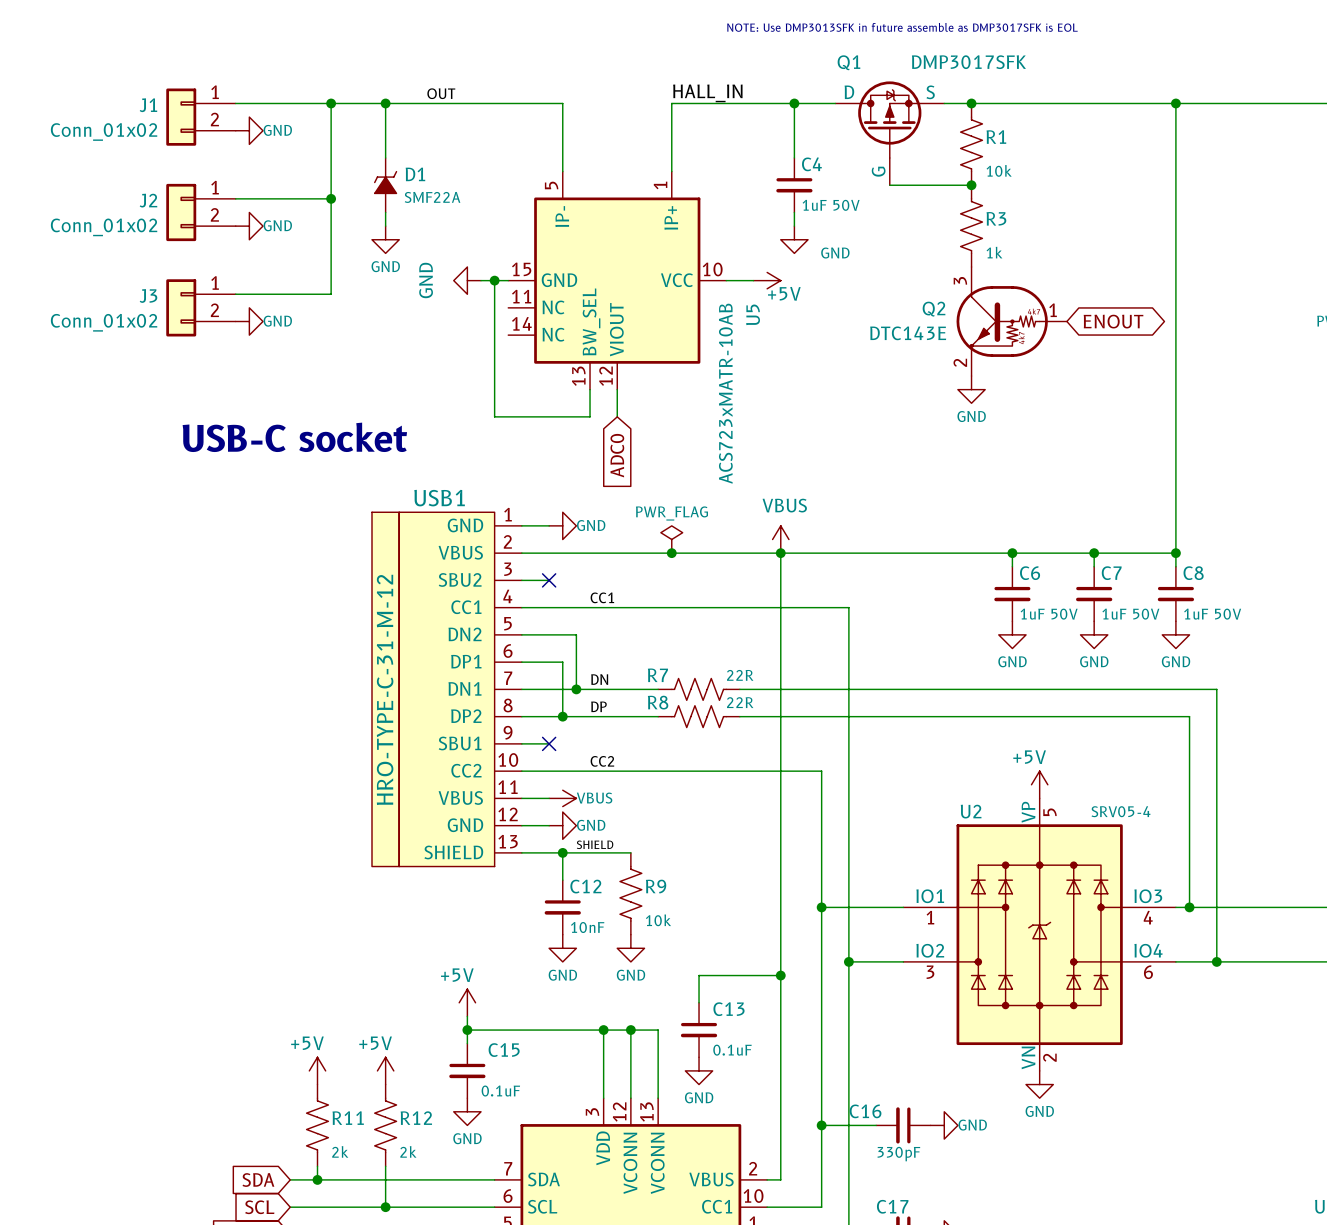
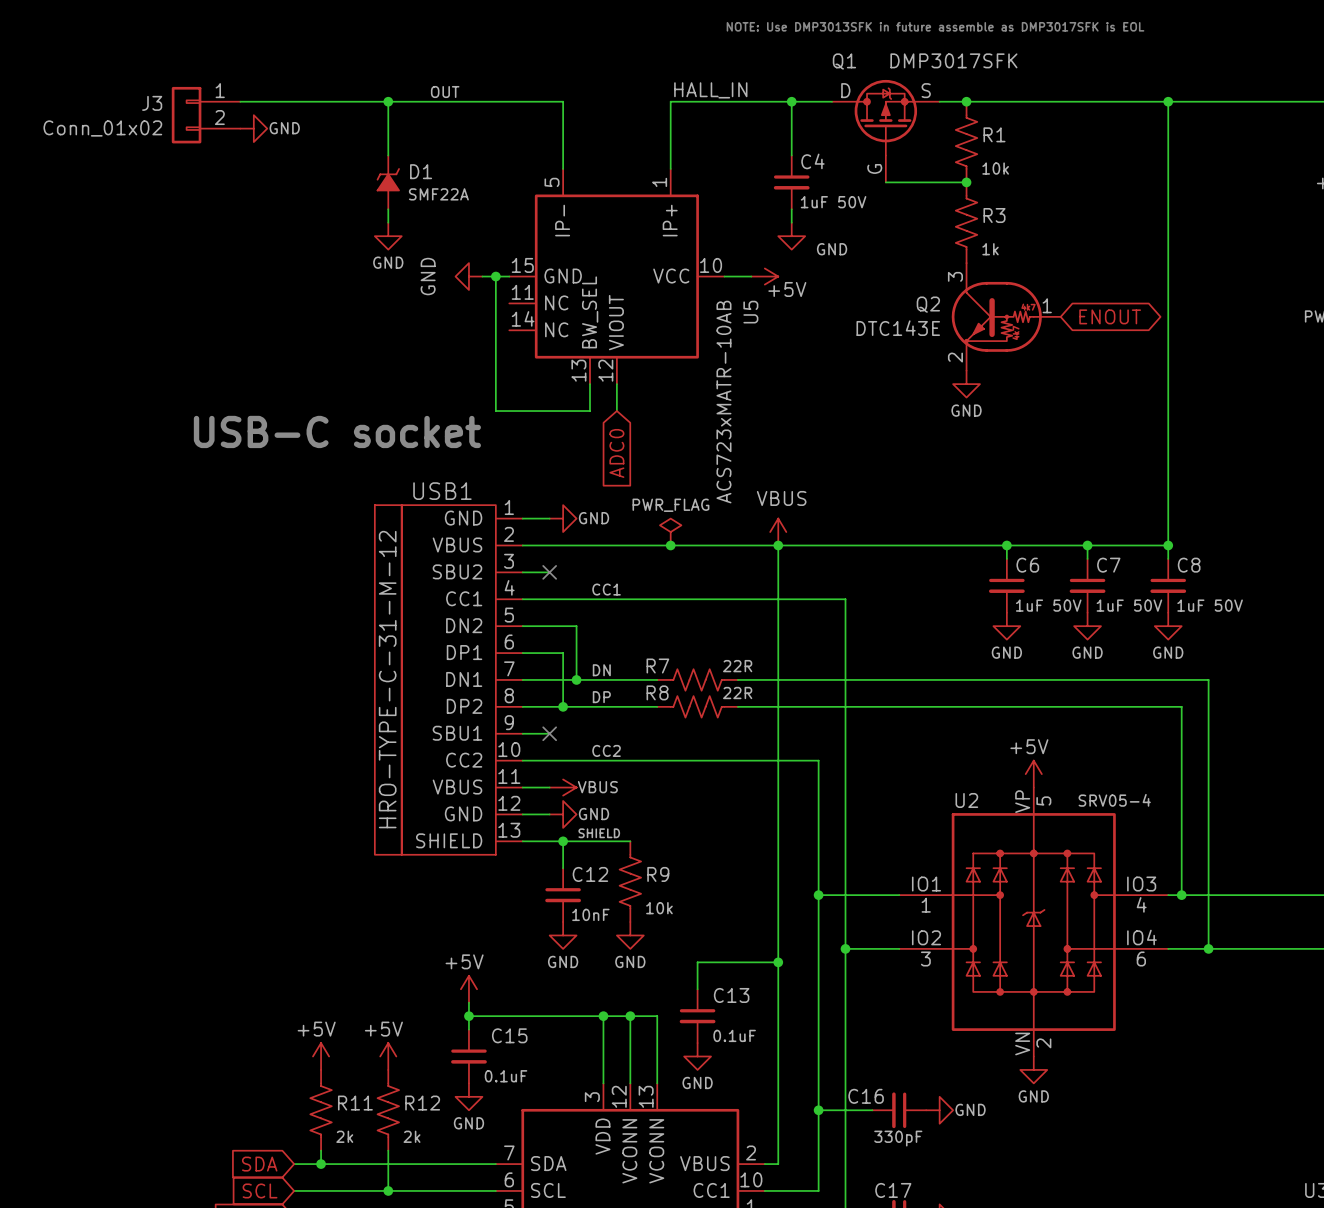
wire: (331, 103) (331, 294) (235, 294) -> none
junction: (331, 103) -> none
J1 name: J1 (148, 105) -> J3 (152, 103)
wire: (235, 198) (331, 198) -> none
junction: (331, 198) -> none
J2: Conn_01x02 (200, 212) -> none
power symbol: GND (249, 226) -> none
J3: Conn_01x02 (200, 307) -> none
power symbol: GND (249, 321) -> none

